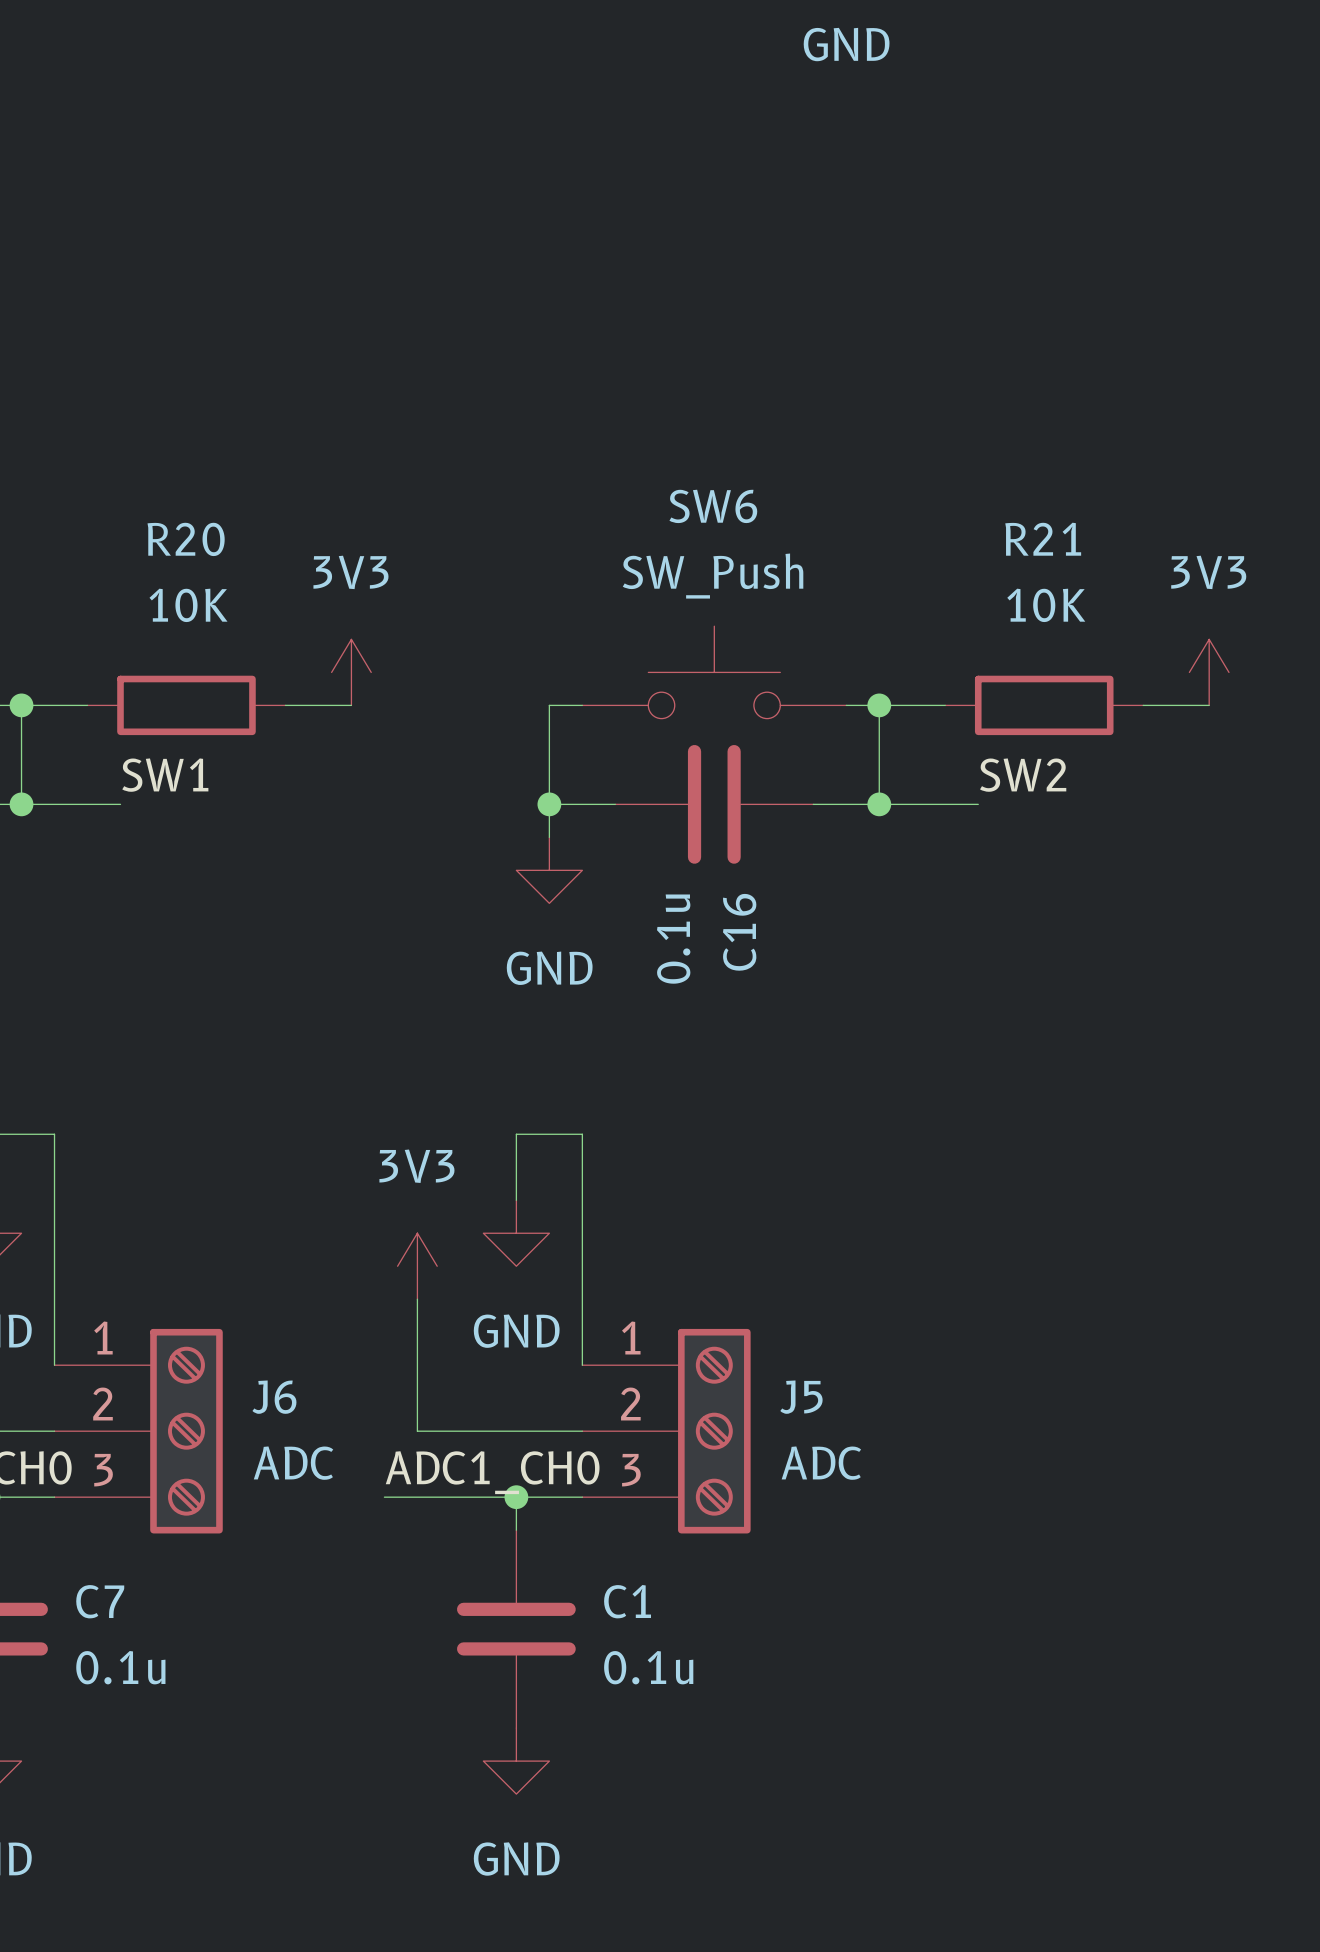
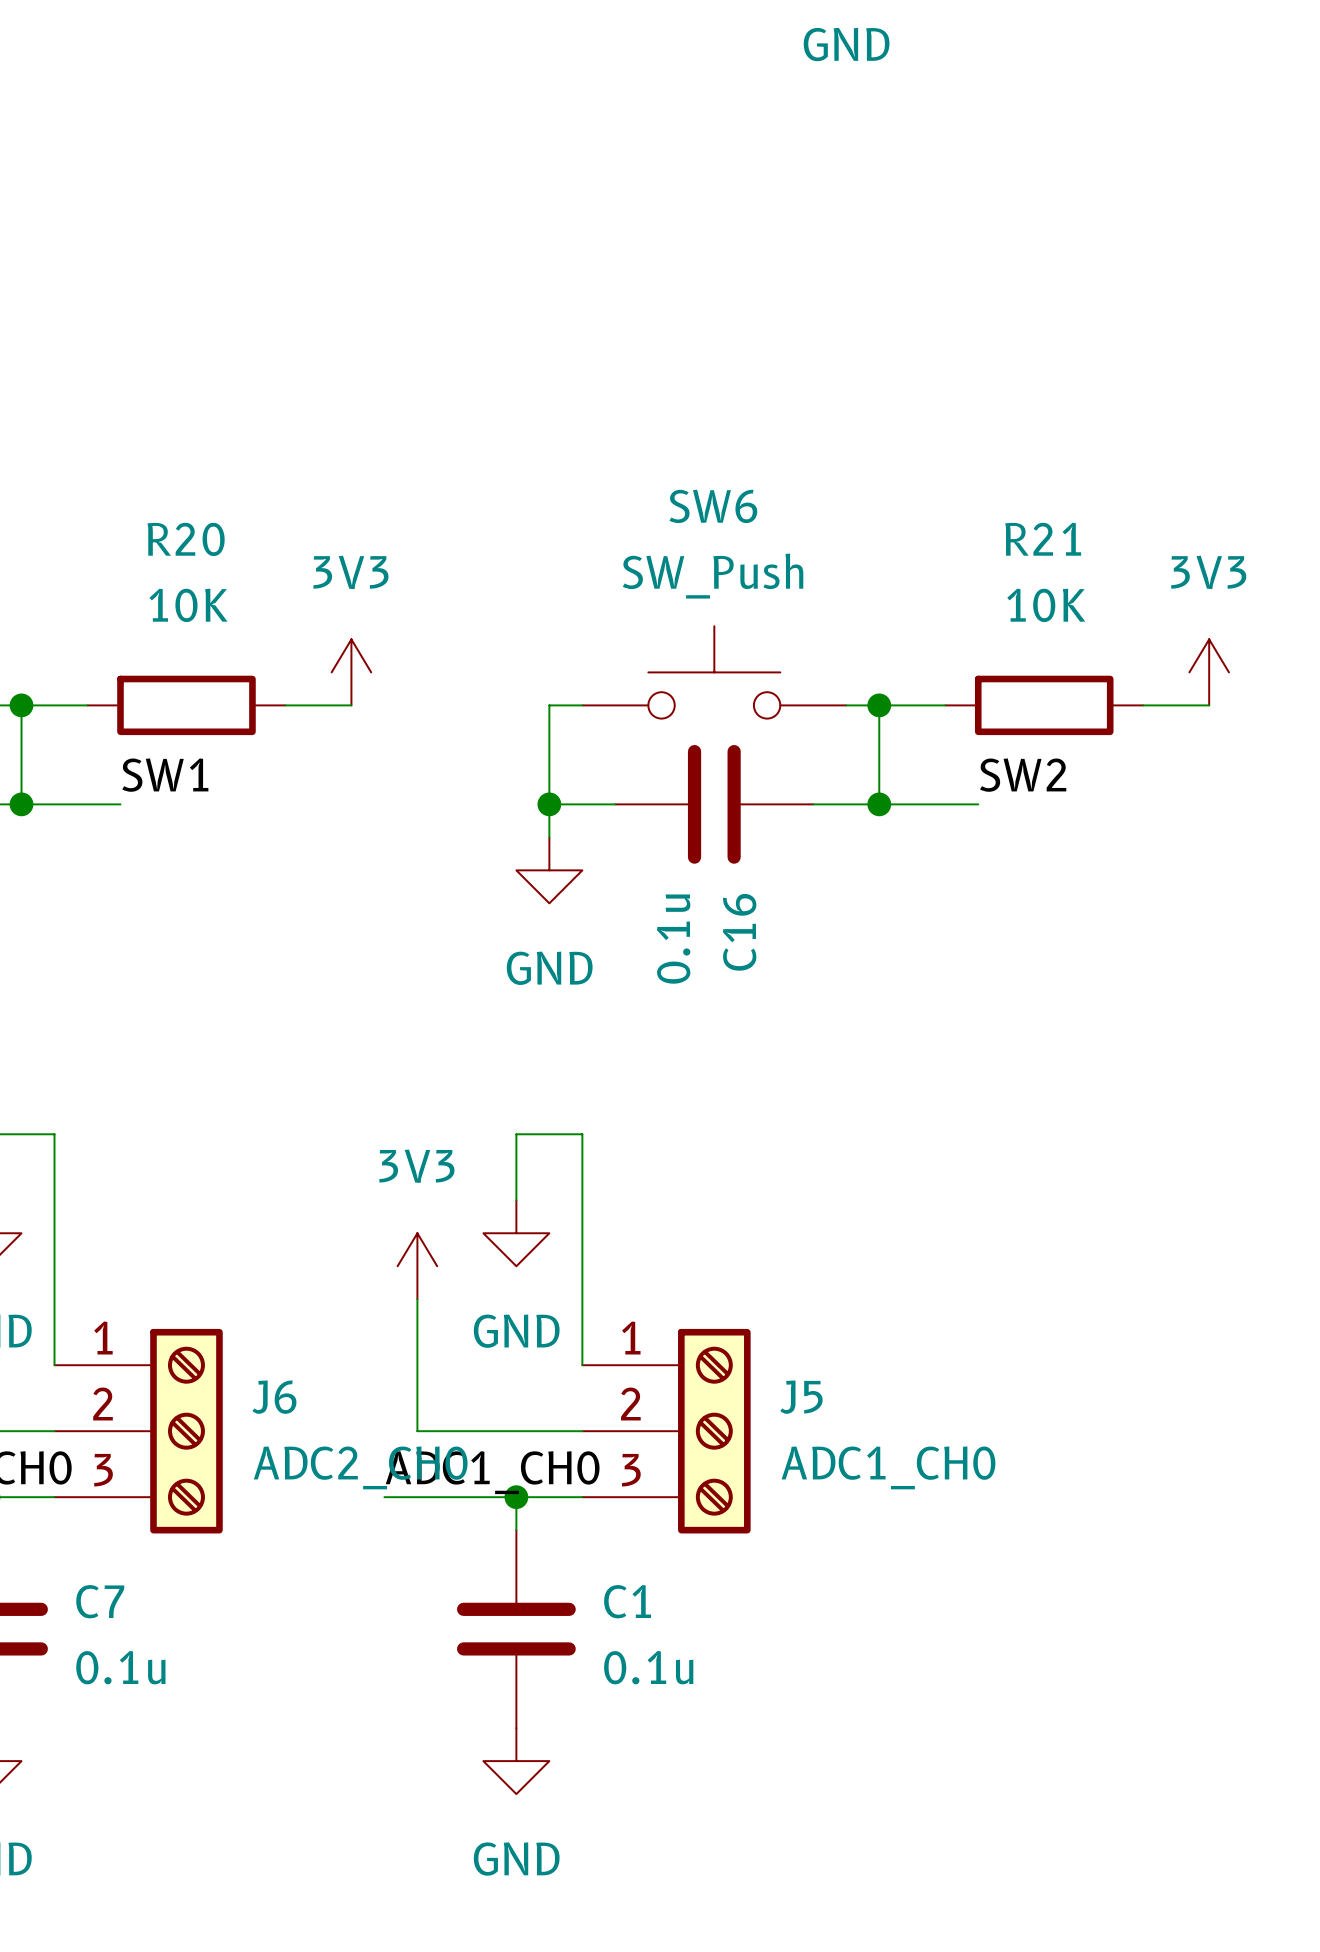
J6 value: ADC (293, 1463) -> ADC2_CH0 (360, 1467)
J5 value: ADC (821, 1463) -> ADC1_CH0 (888, 1467)

